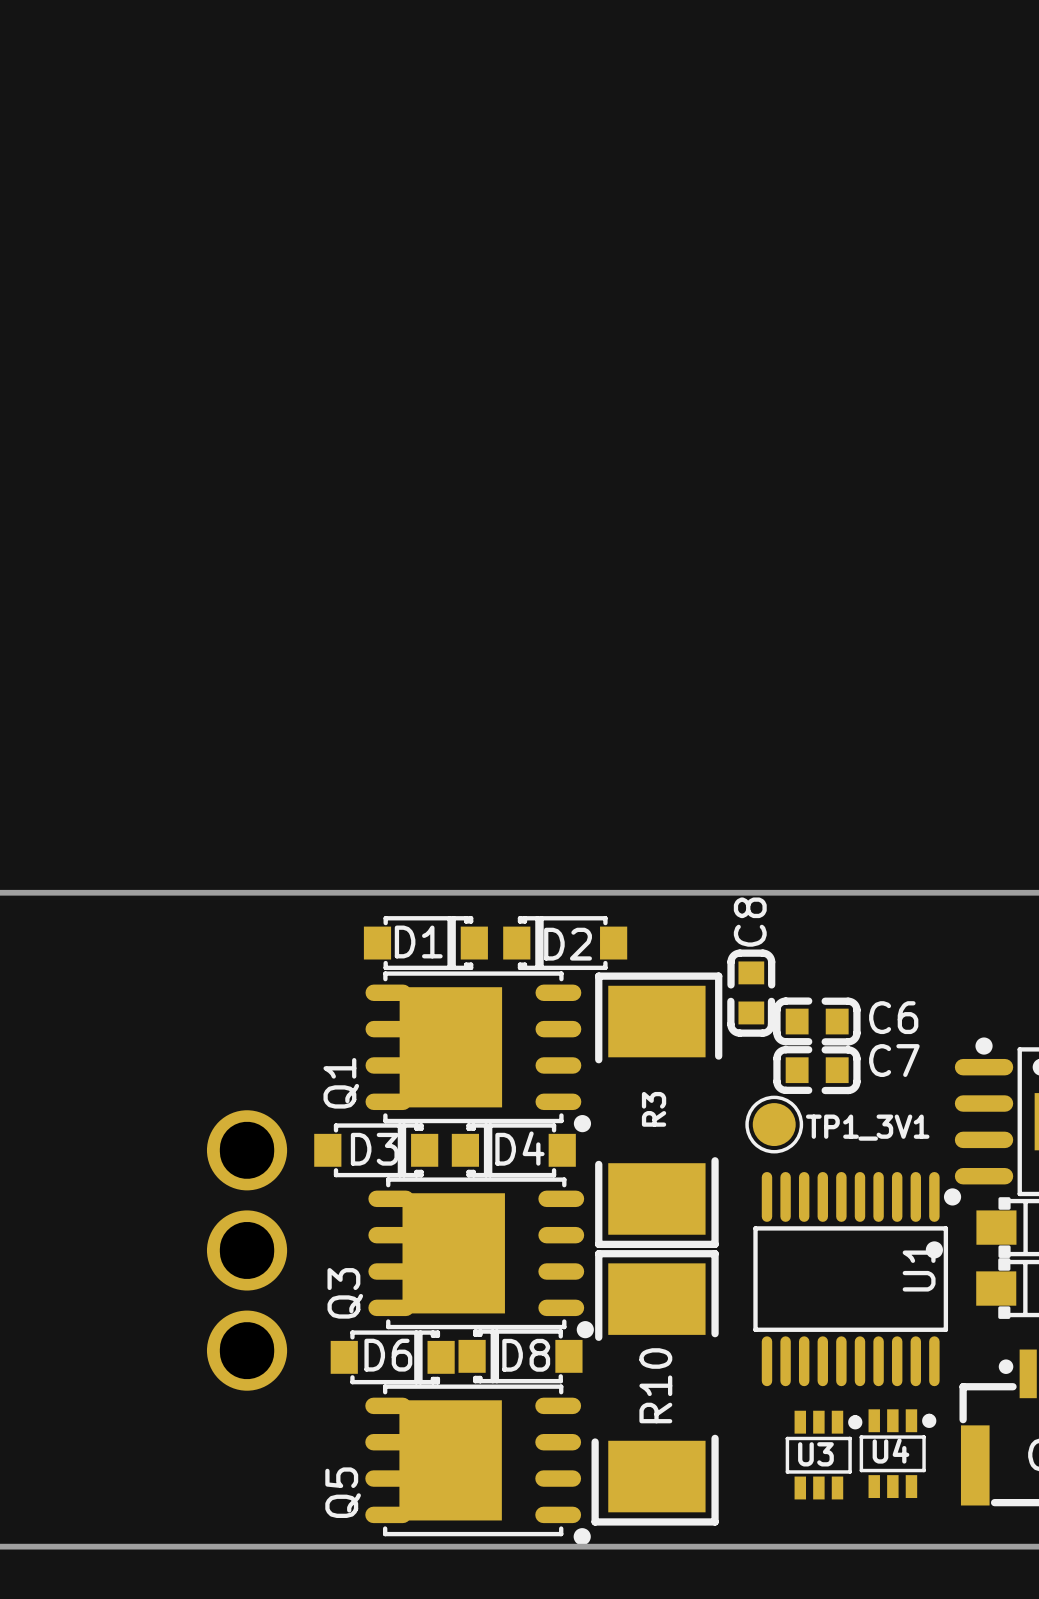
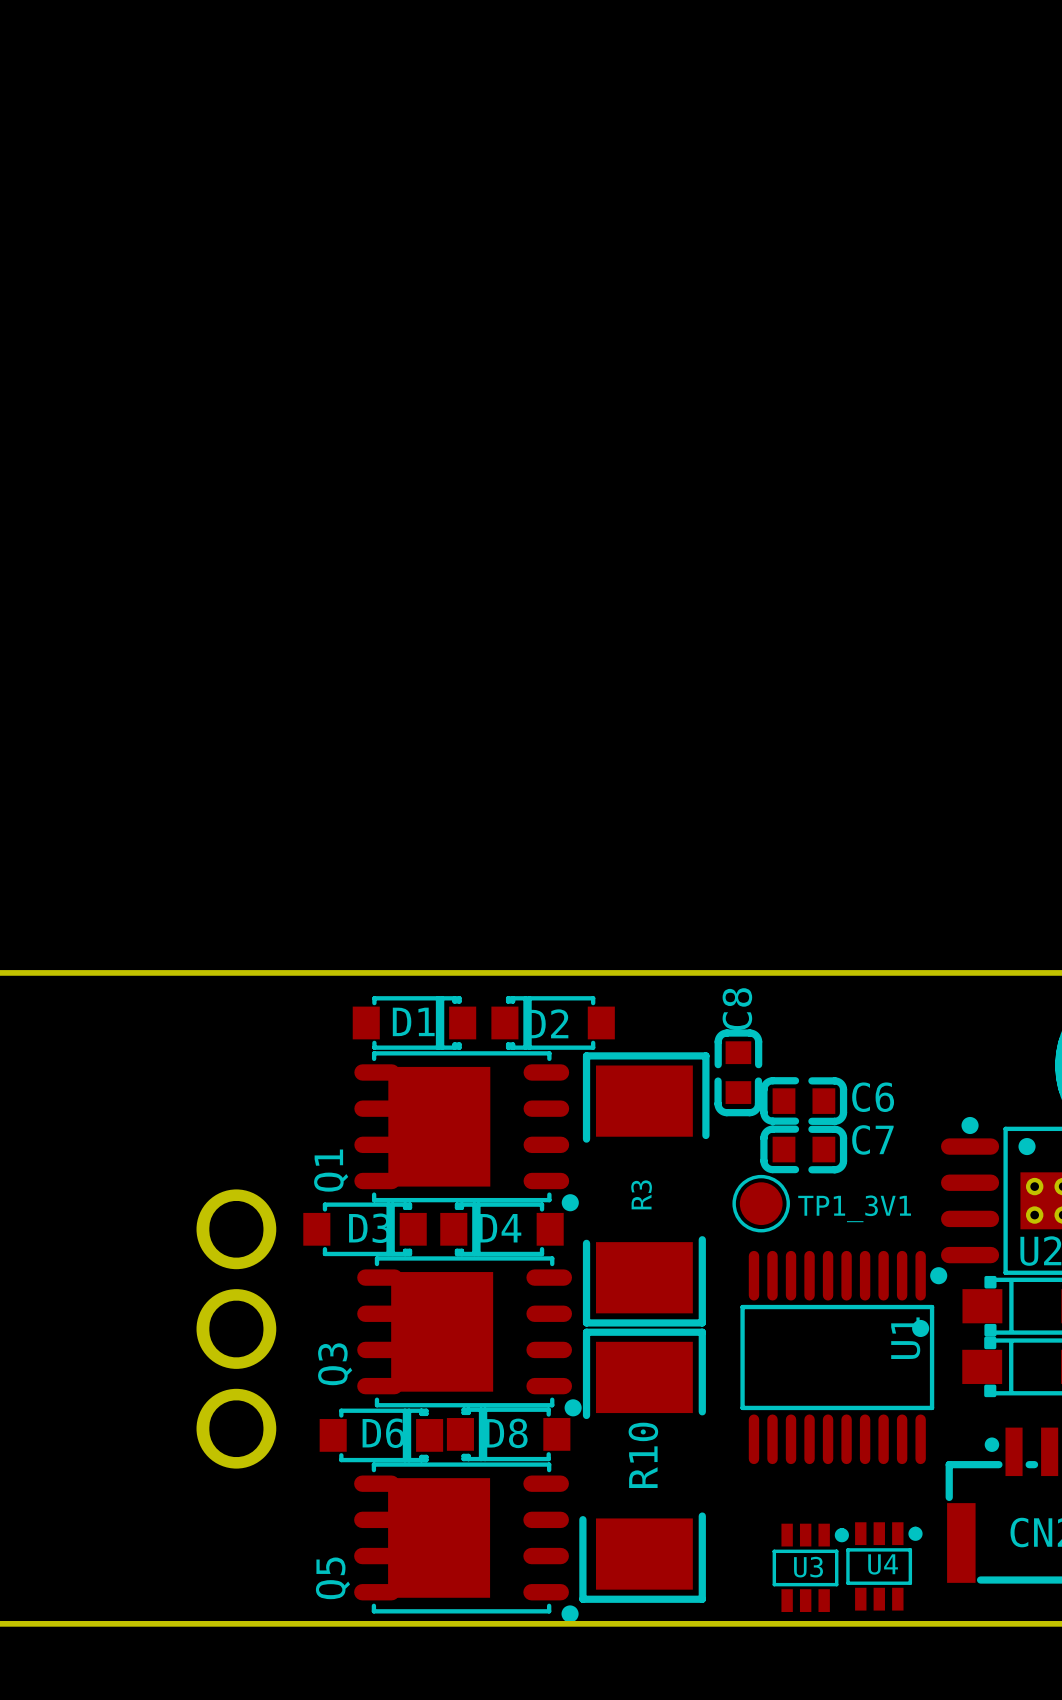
U4 position: (898, 1453) -> (884, 1566)
U3 position: (824, 1455) -> (810, 1567)

